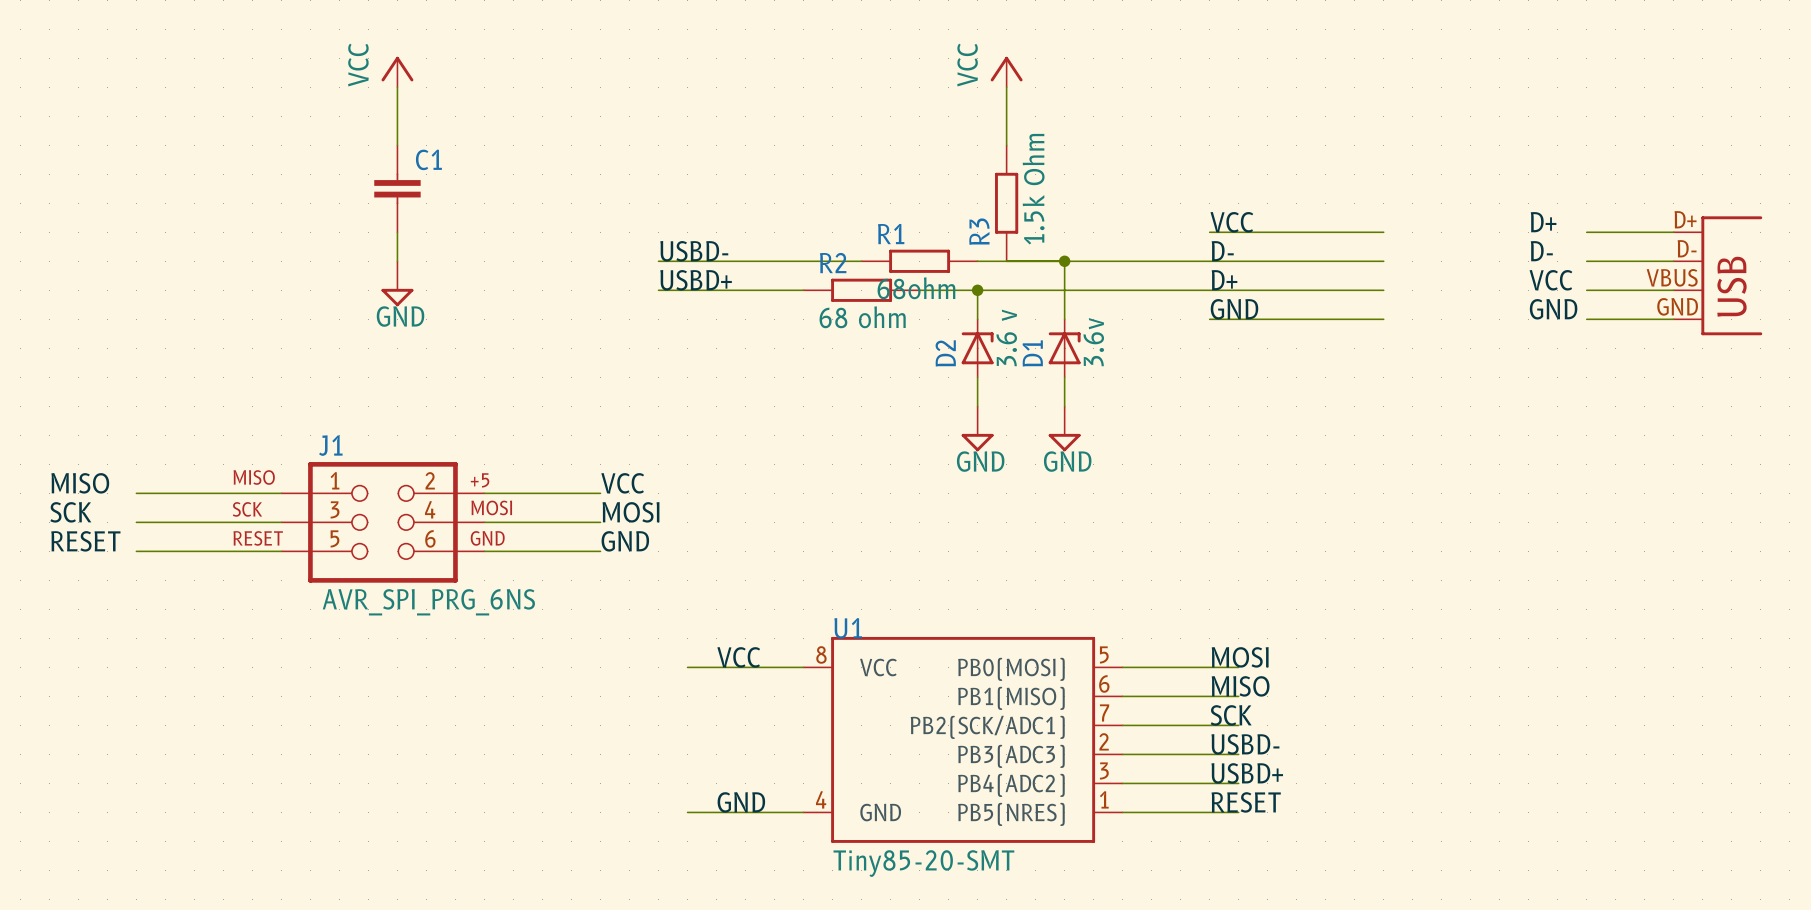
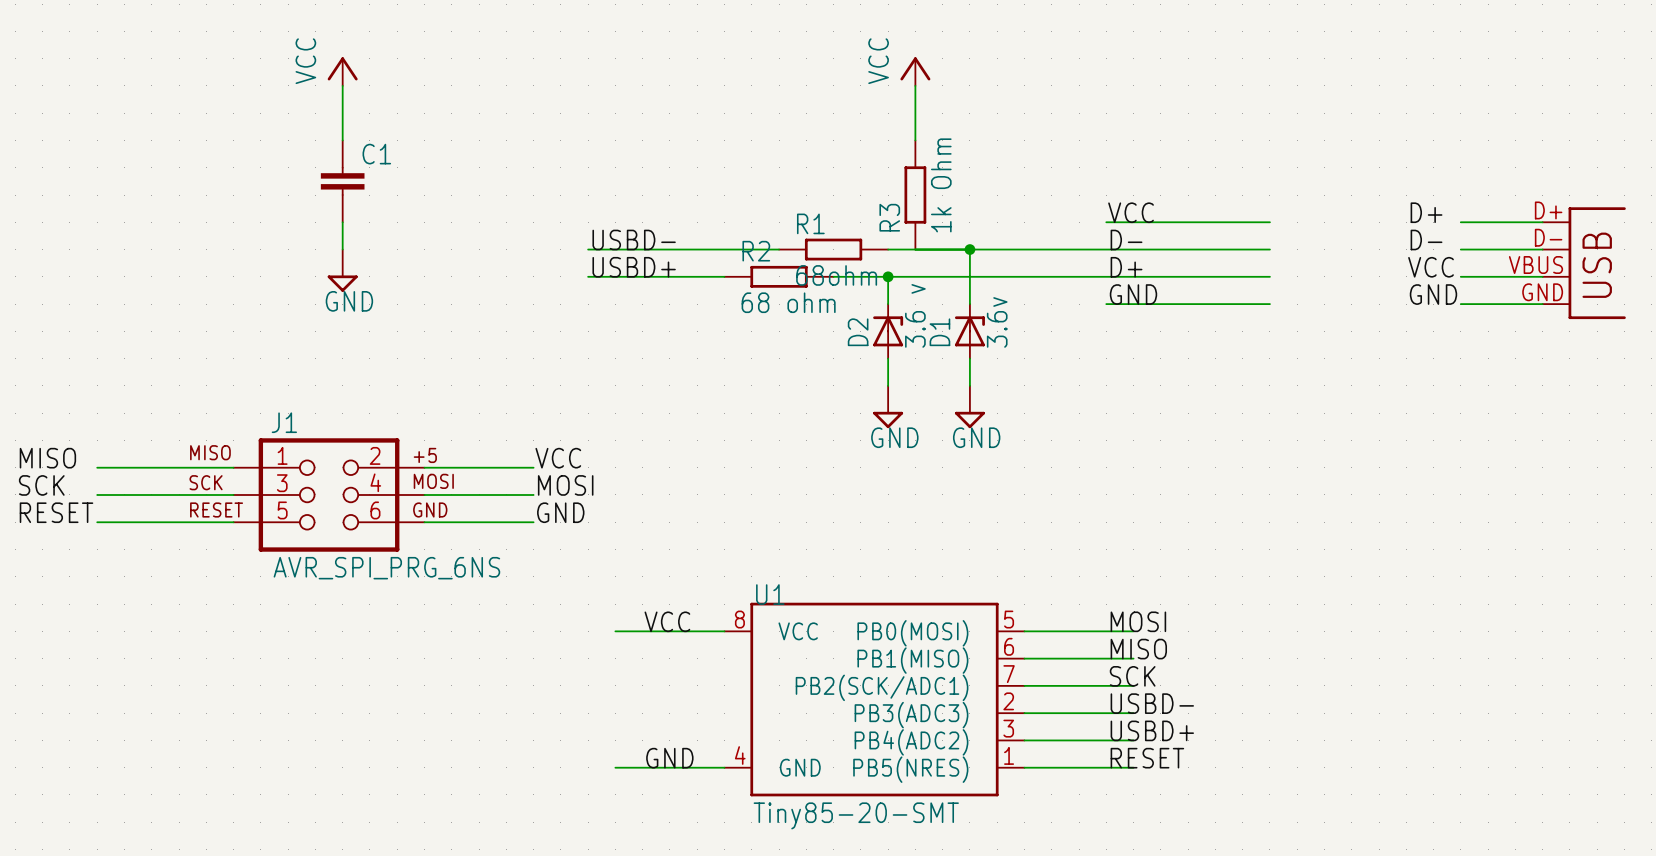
R3 value: 1.5k Ohm (1033, 189) -> 1k Ohm (941, 185)

